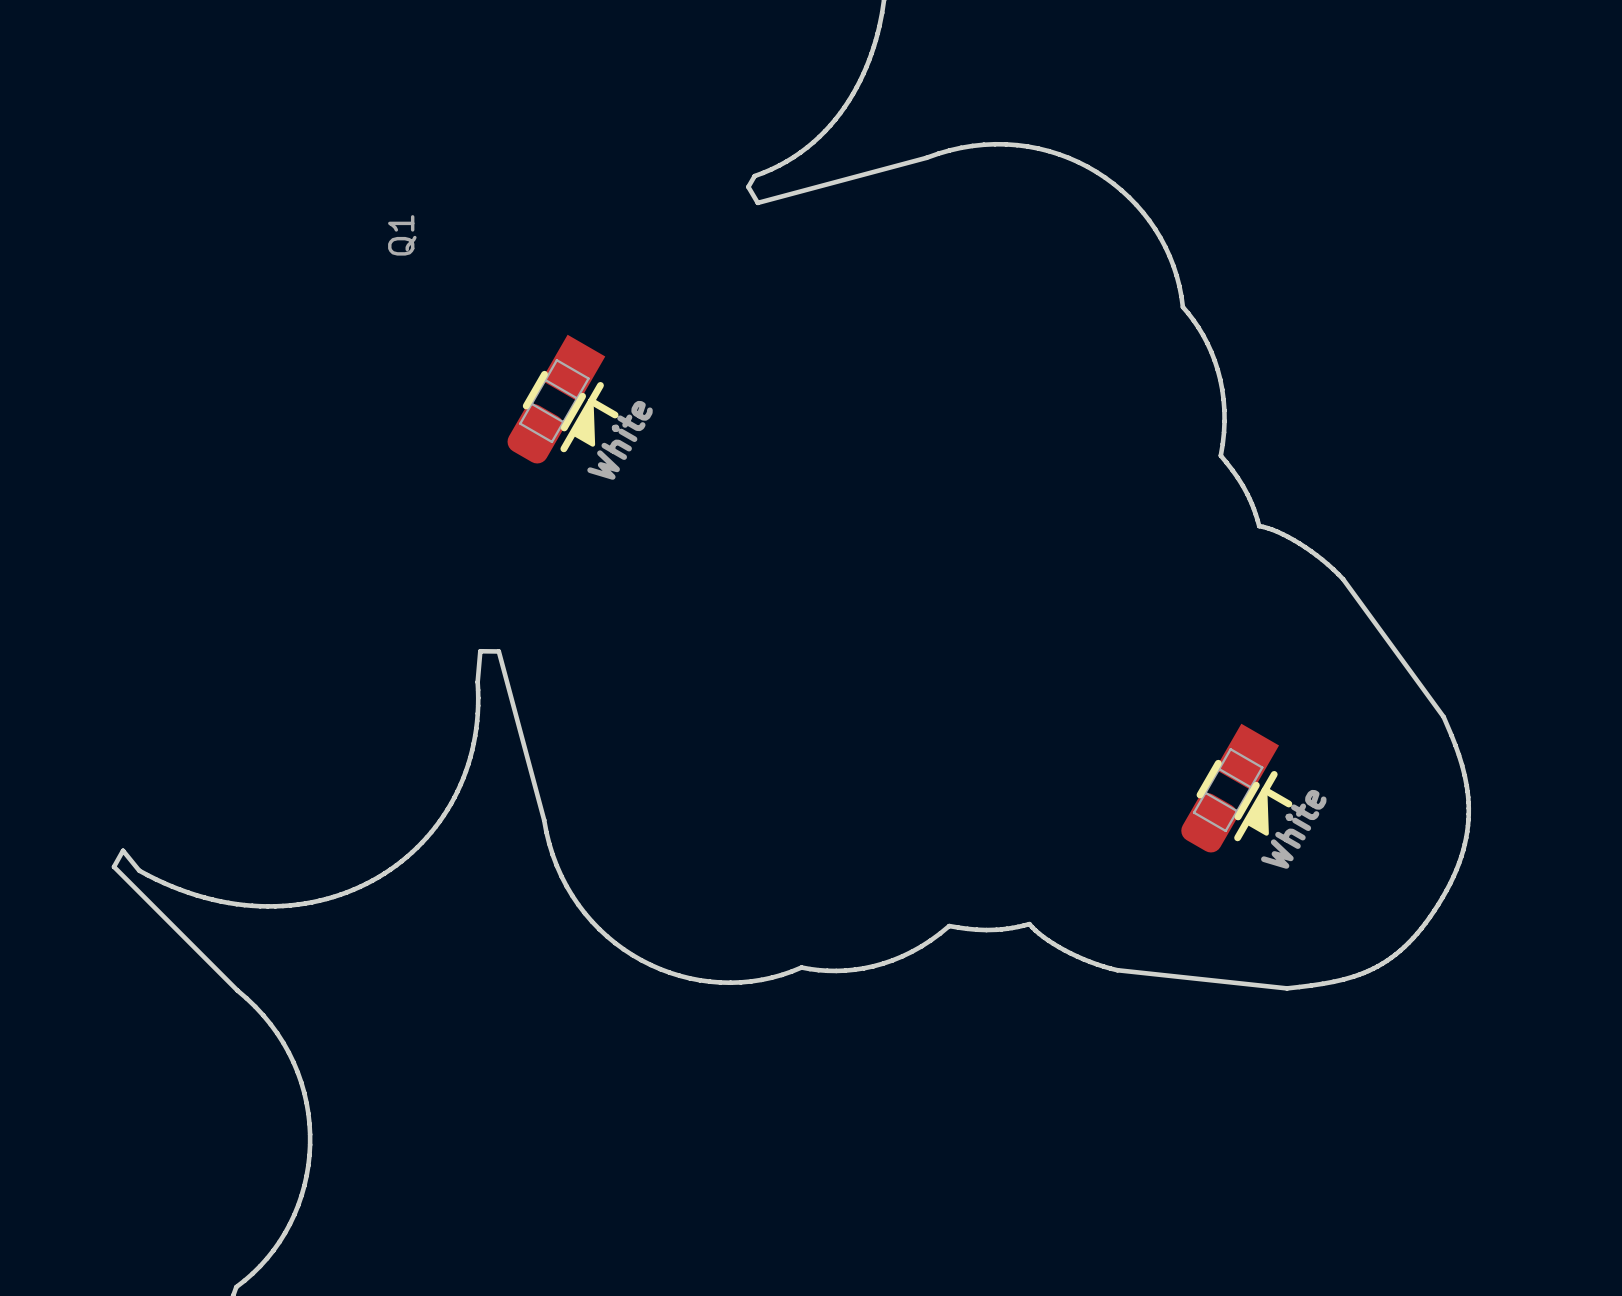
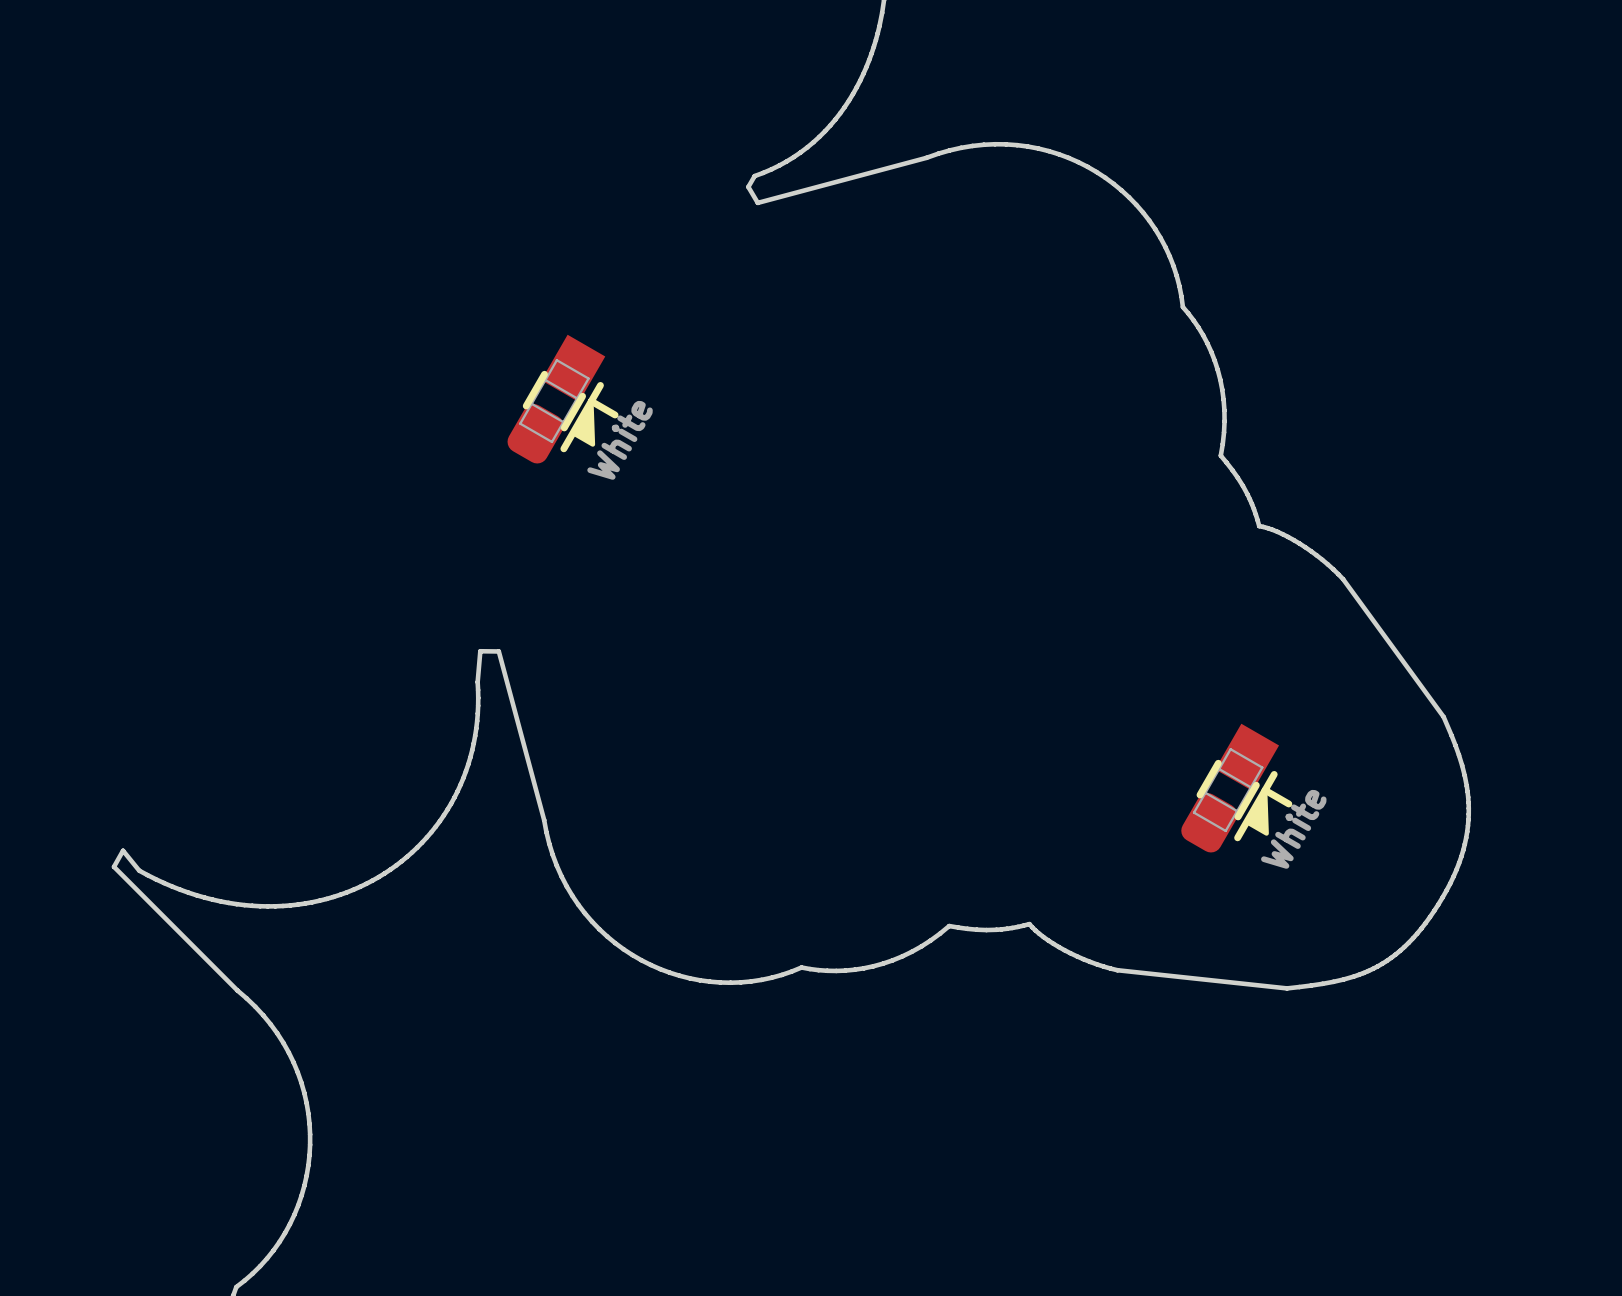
Q1: (402, 235) -> none

